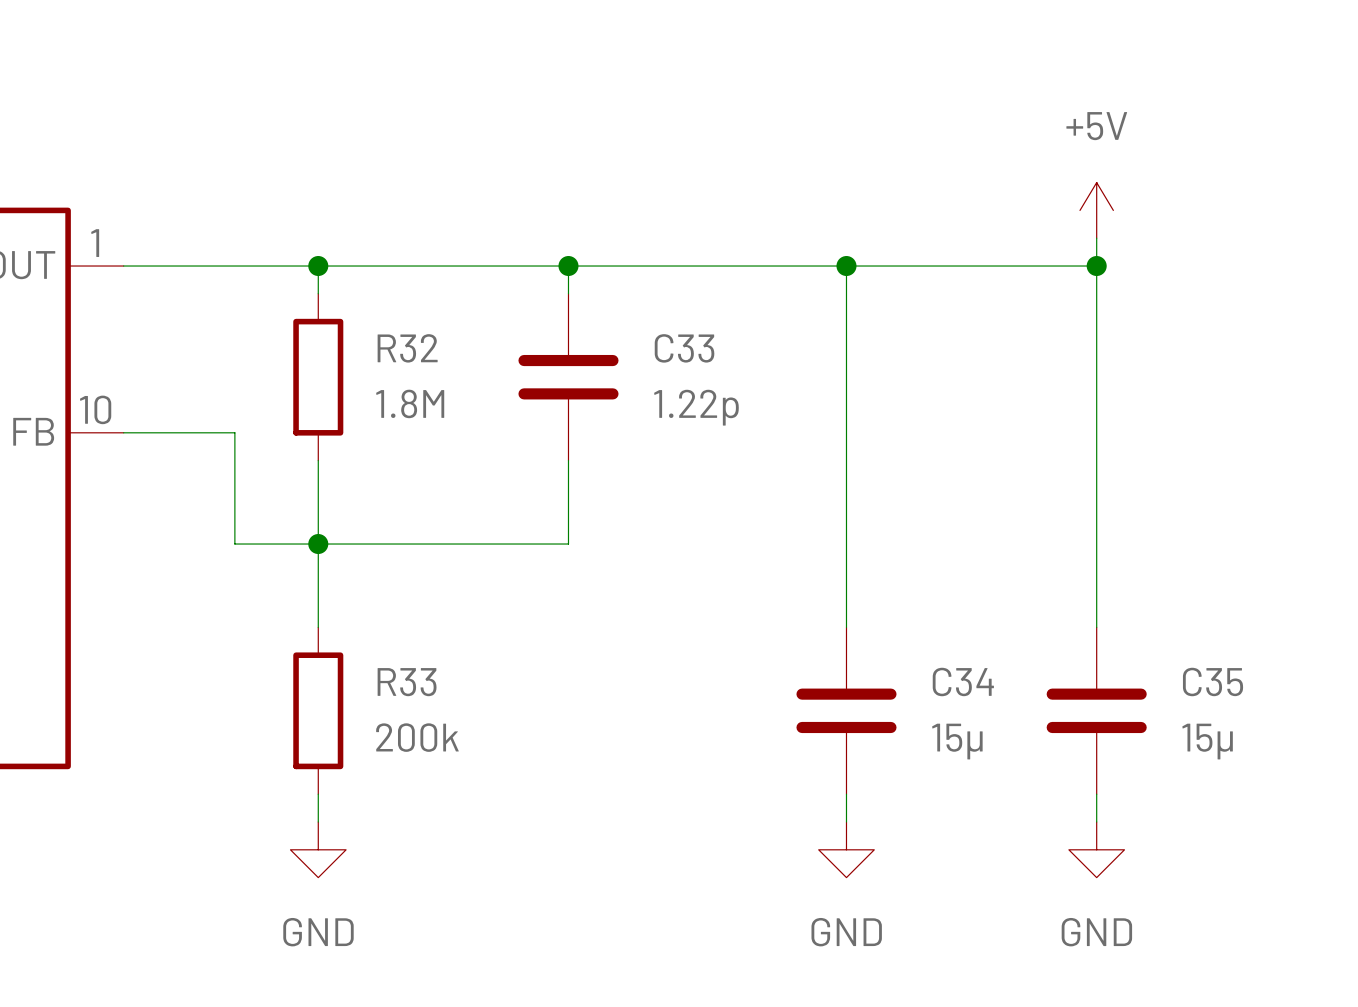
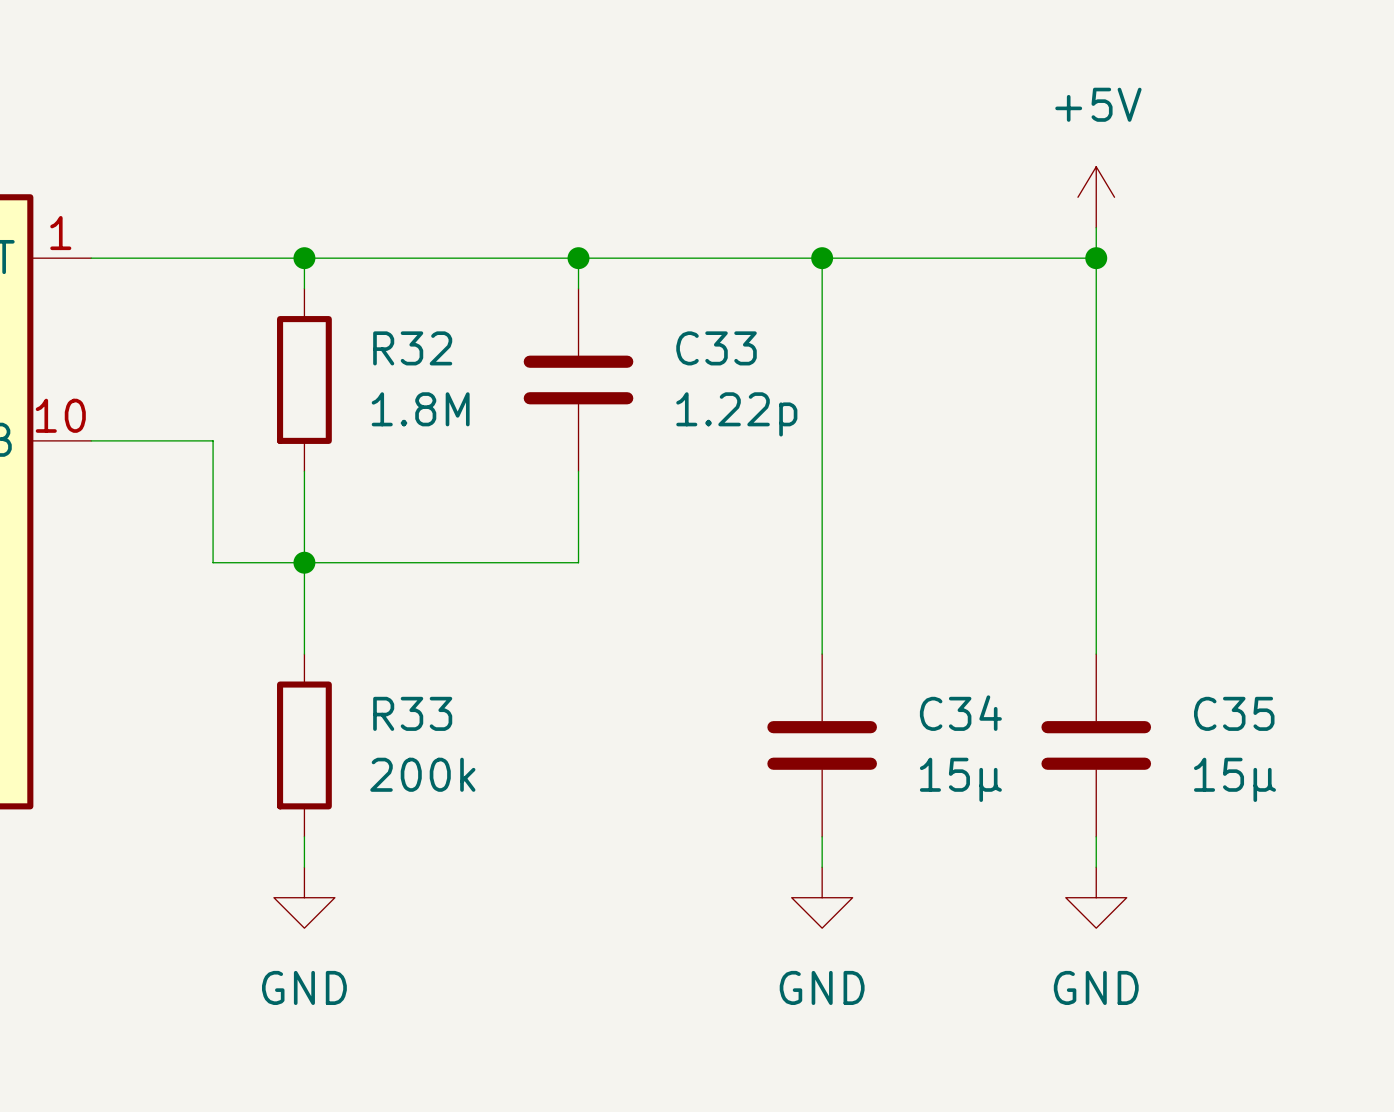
power symbol position: +5V (1096, 210) -> +5V (1096, 197)
wire: (1096, 238) (1096, 627) -> (1096, 227) (1096, 654)
wire: (846, 266) (846, 627) -> (822, 258) (822, 654)
junction position: (846, 266) -> (822, 258)
wire: (1041, 266) (1096, 266) -> none
junction position: (1096, 266) -> (1096, 258)
C34 position: (846, 710) -> (822, 745)
C35 position: (1096, 710) -> (1096, 745)
wire: (846, 794) (846, 822) -> (822, 836) (822, 867)
wire: (1096, 794) (1096, 822) -> (1096, 836) (1096, 867)
power symbol position: GND (846, 849) -> GND (822, 897)
power symbol position: GND (1096, 849) -> GND (1096, 897)

